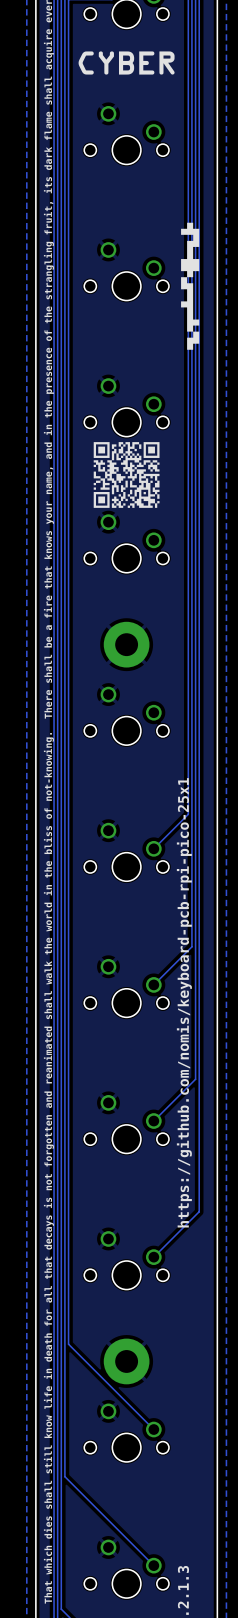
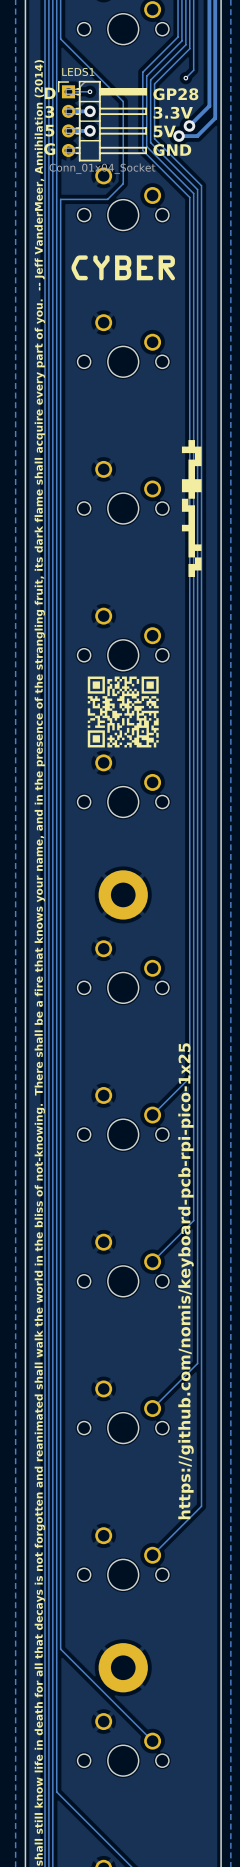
text: https://github.com/nomis/keyboard-pcb-rpi-pico-25x1 (184, 1002) -> https://github.com/nomis/keyboard-pcb-rpi-pico-1x25 (186, 1281)

